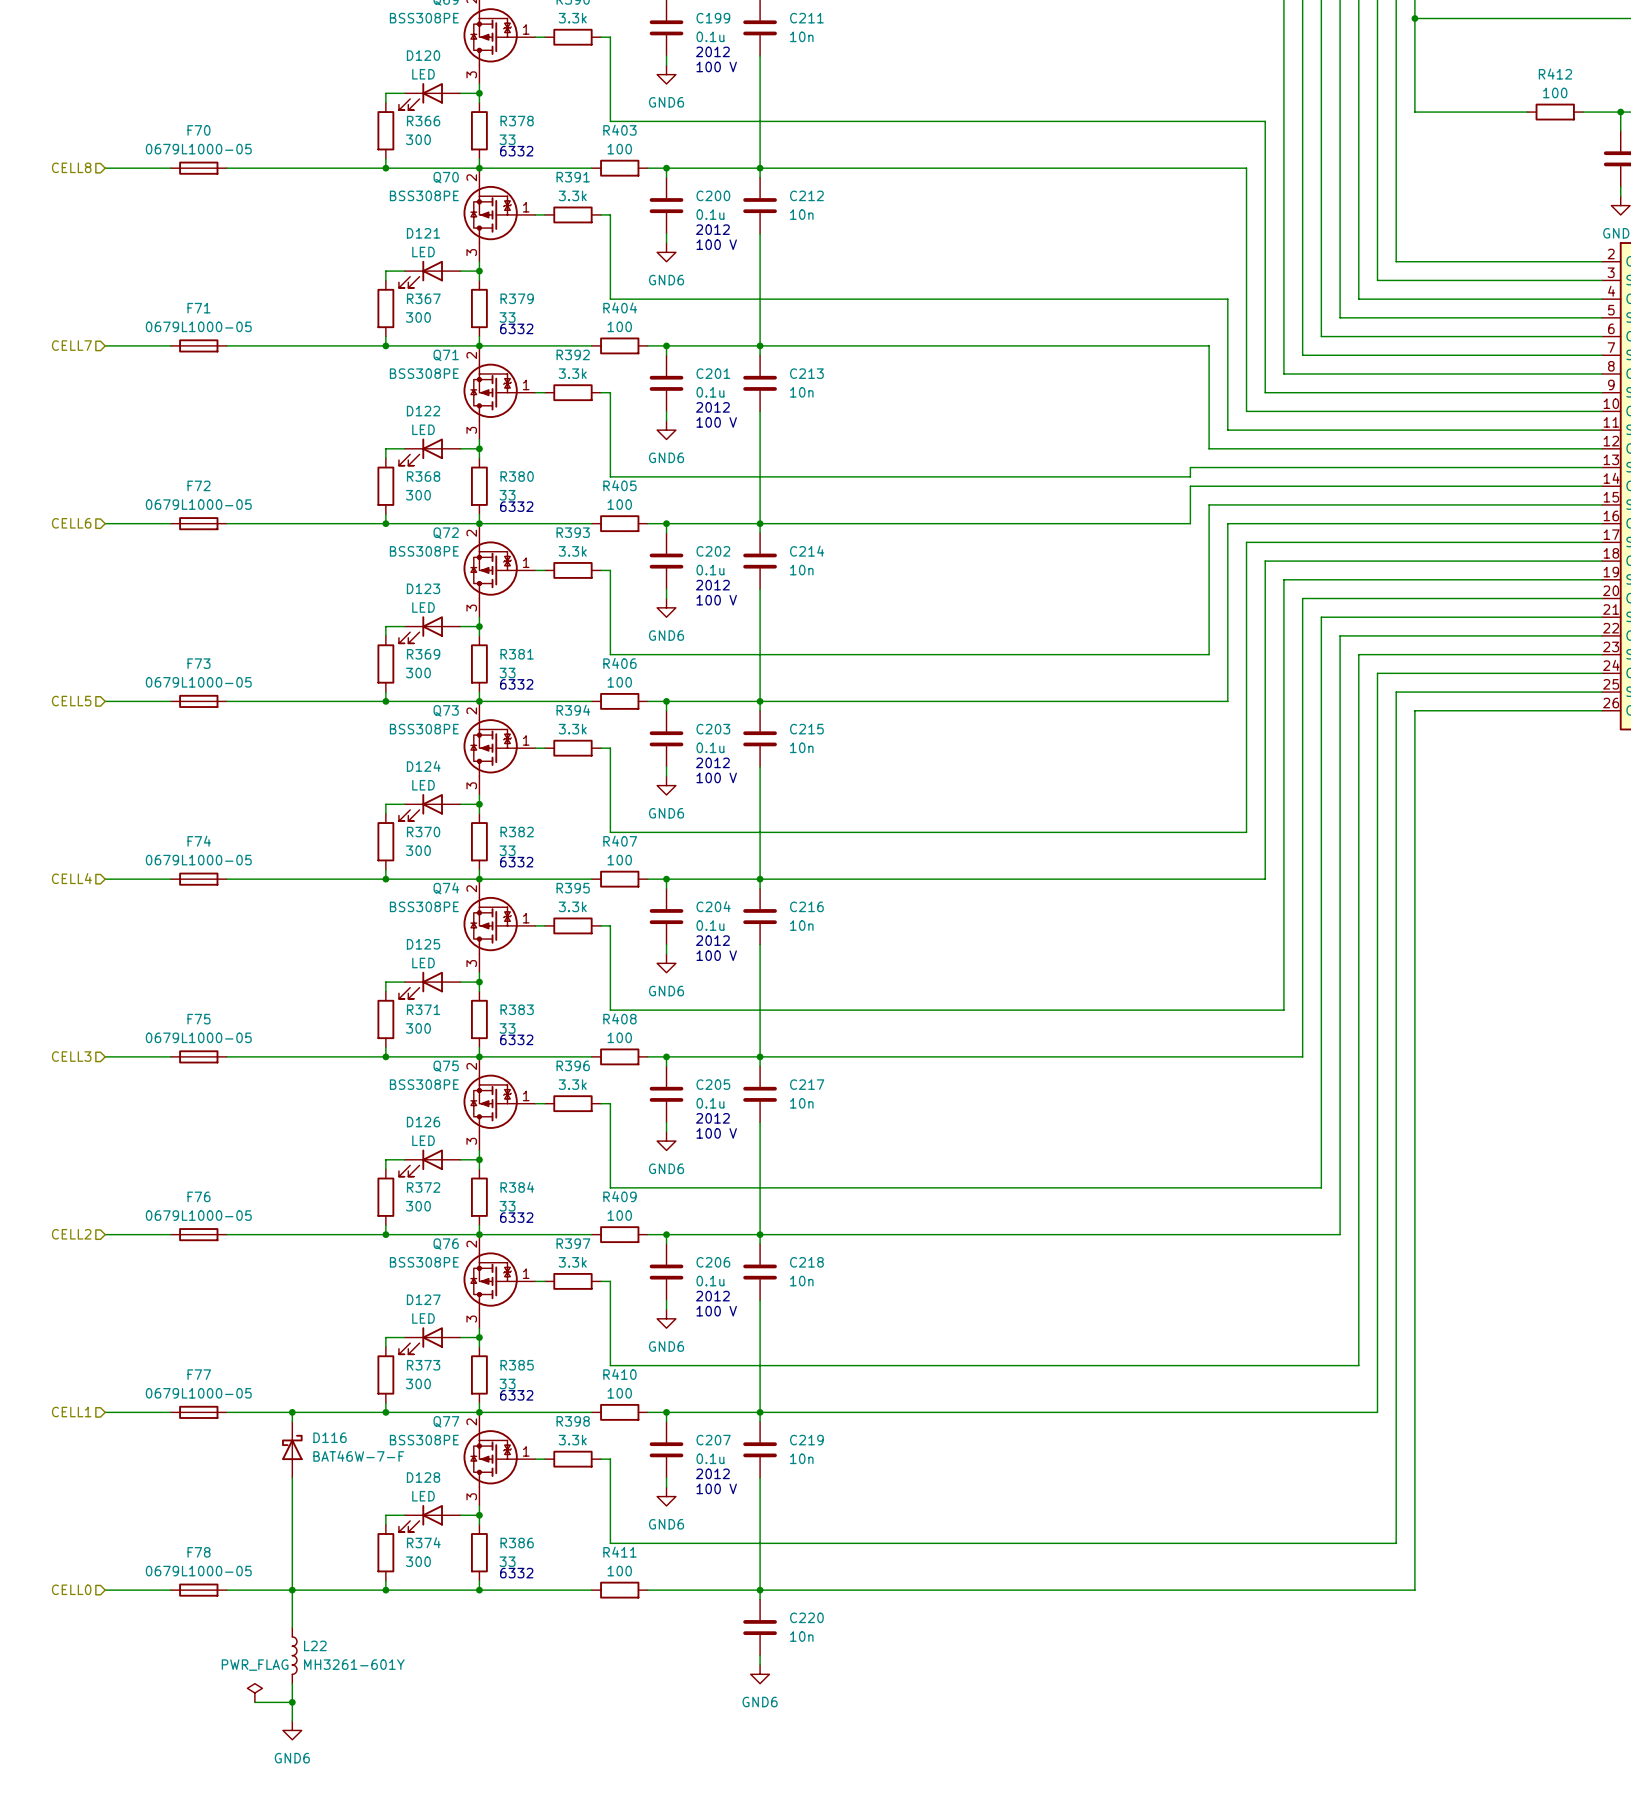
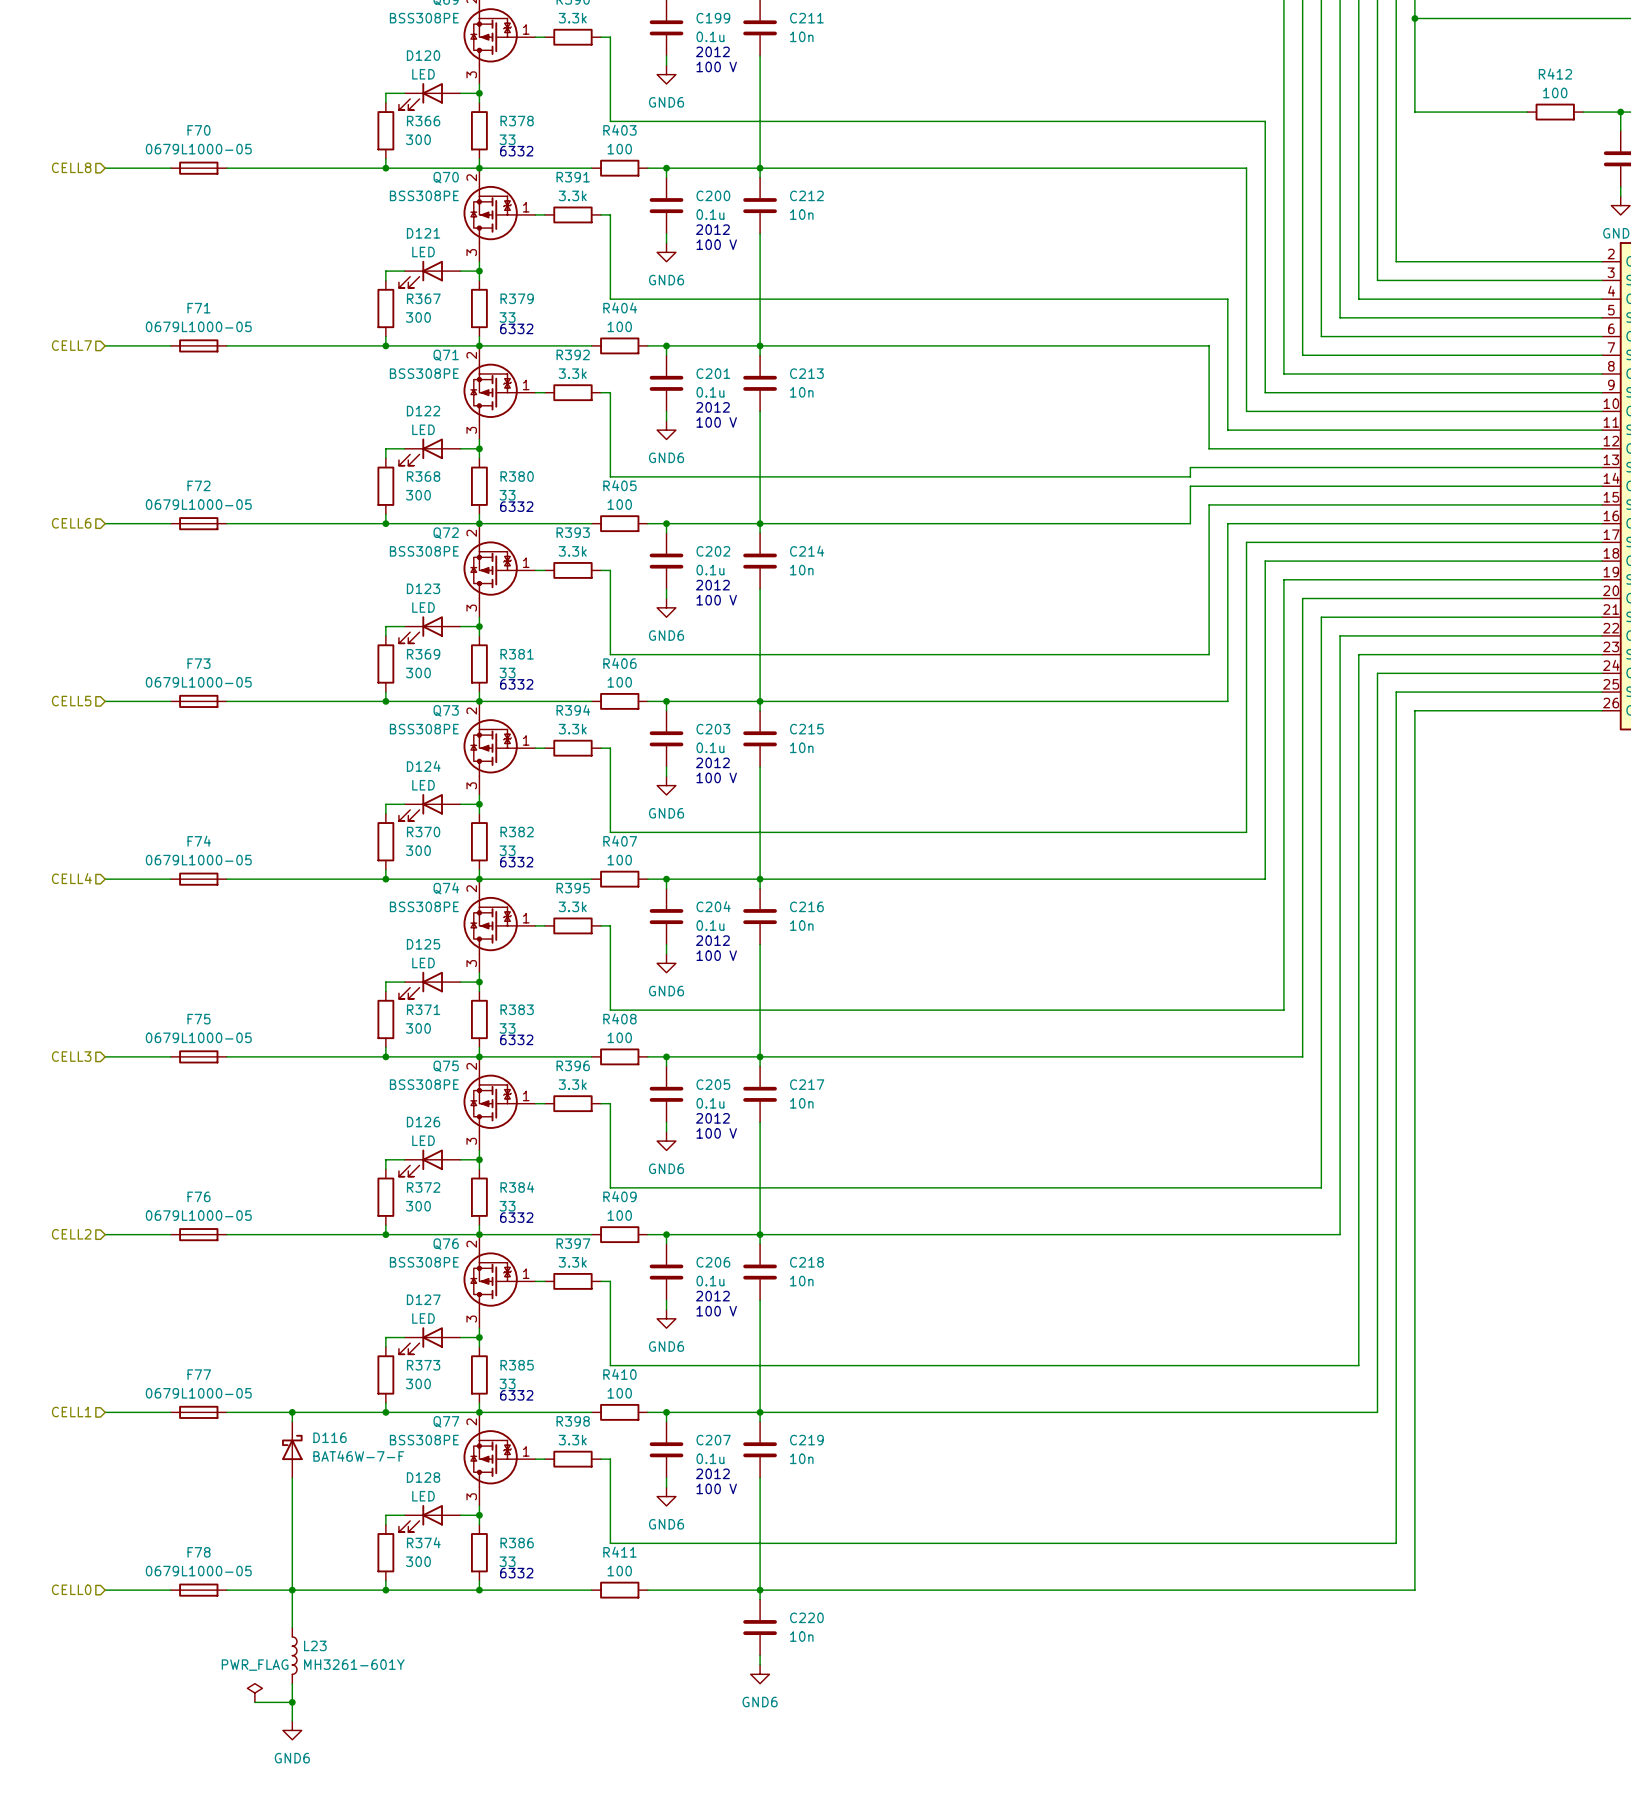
L22 name: L22 (315, 1645) -> L23 (315, 1645)

